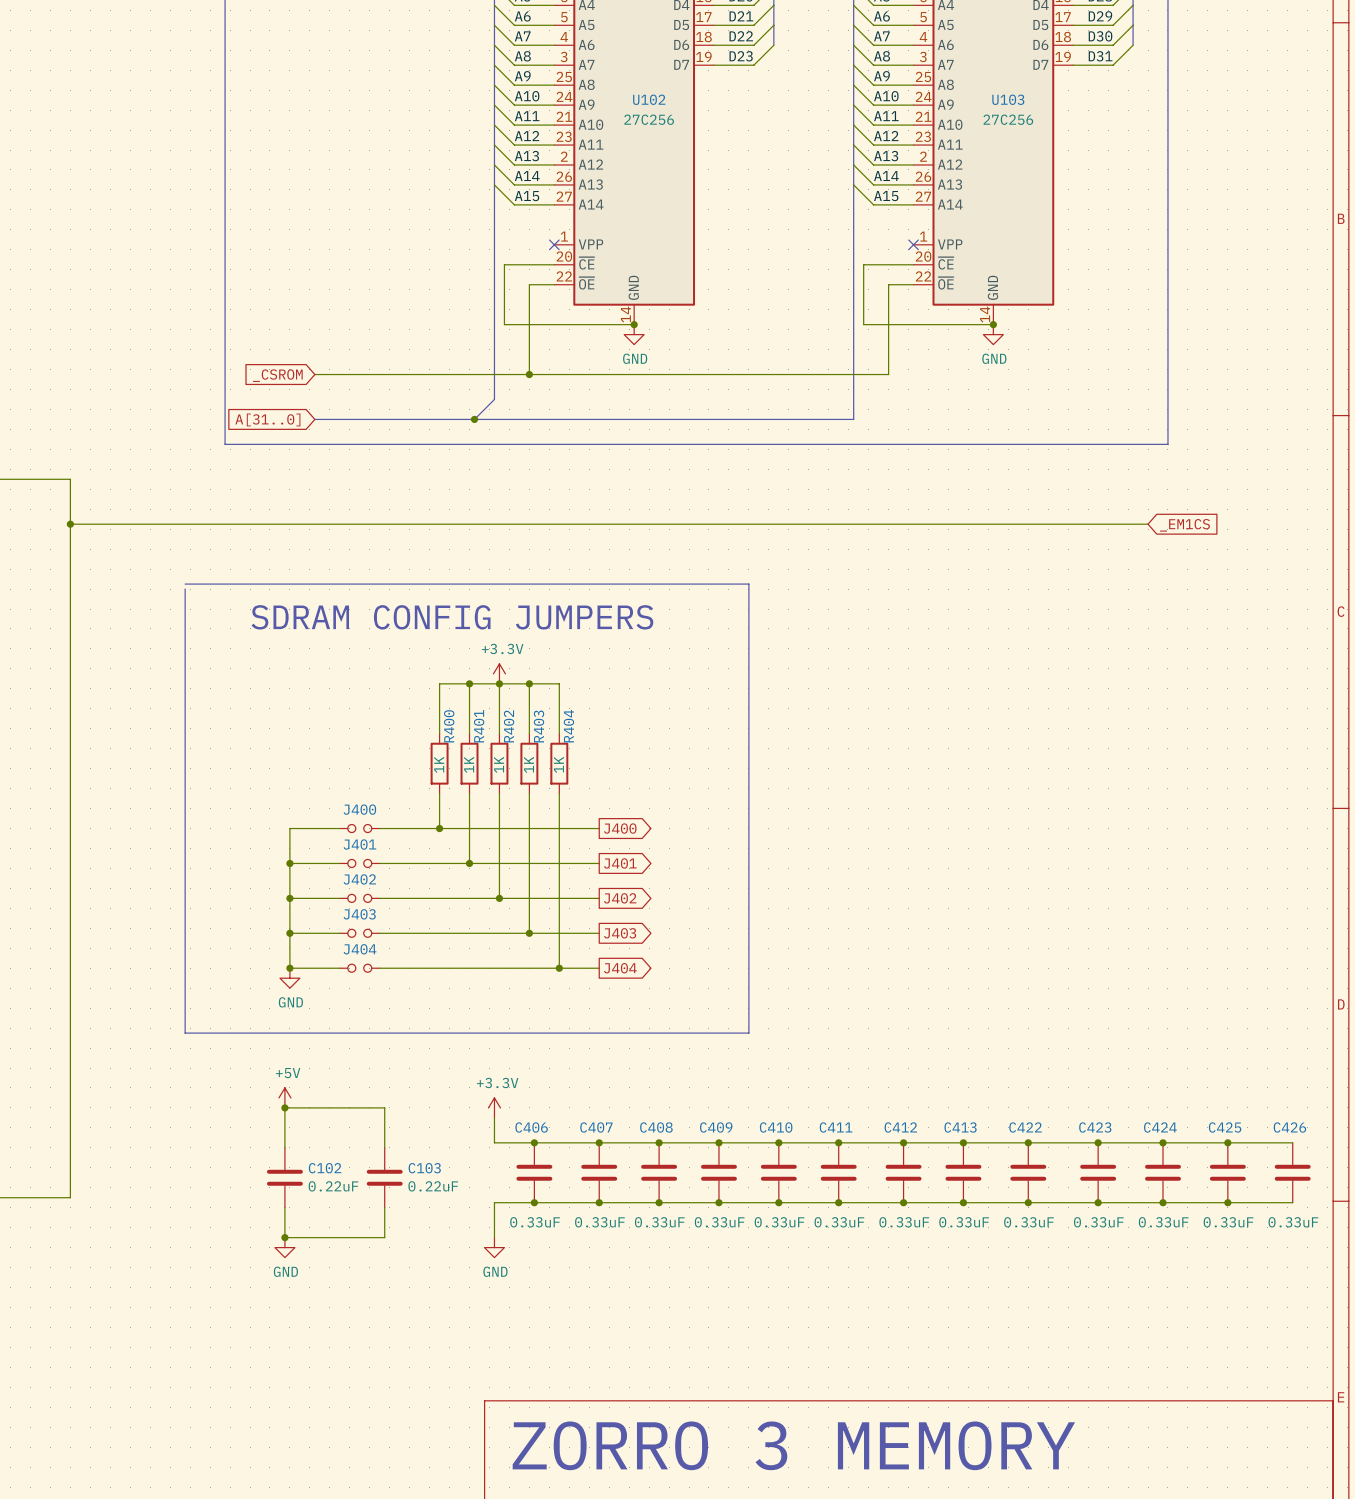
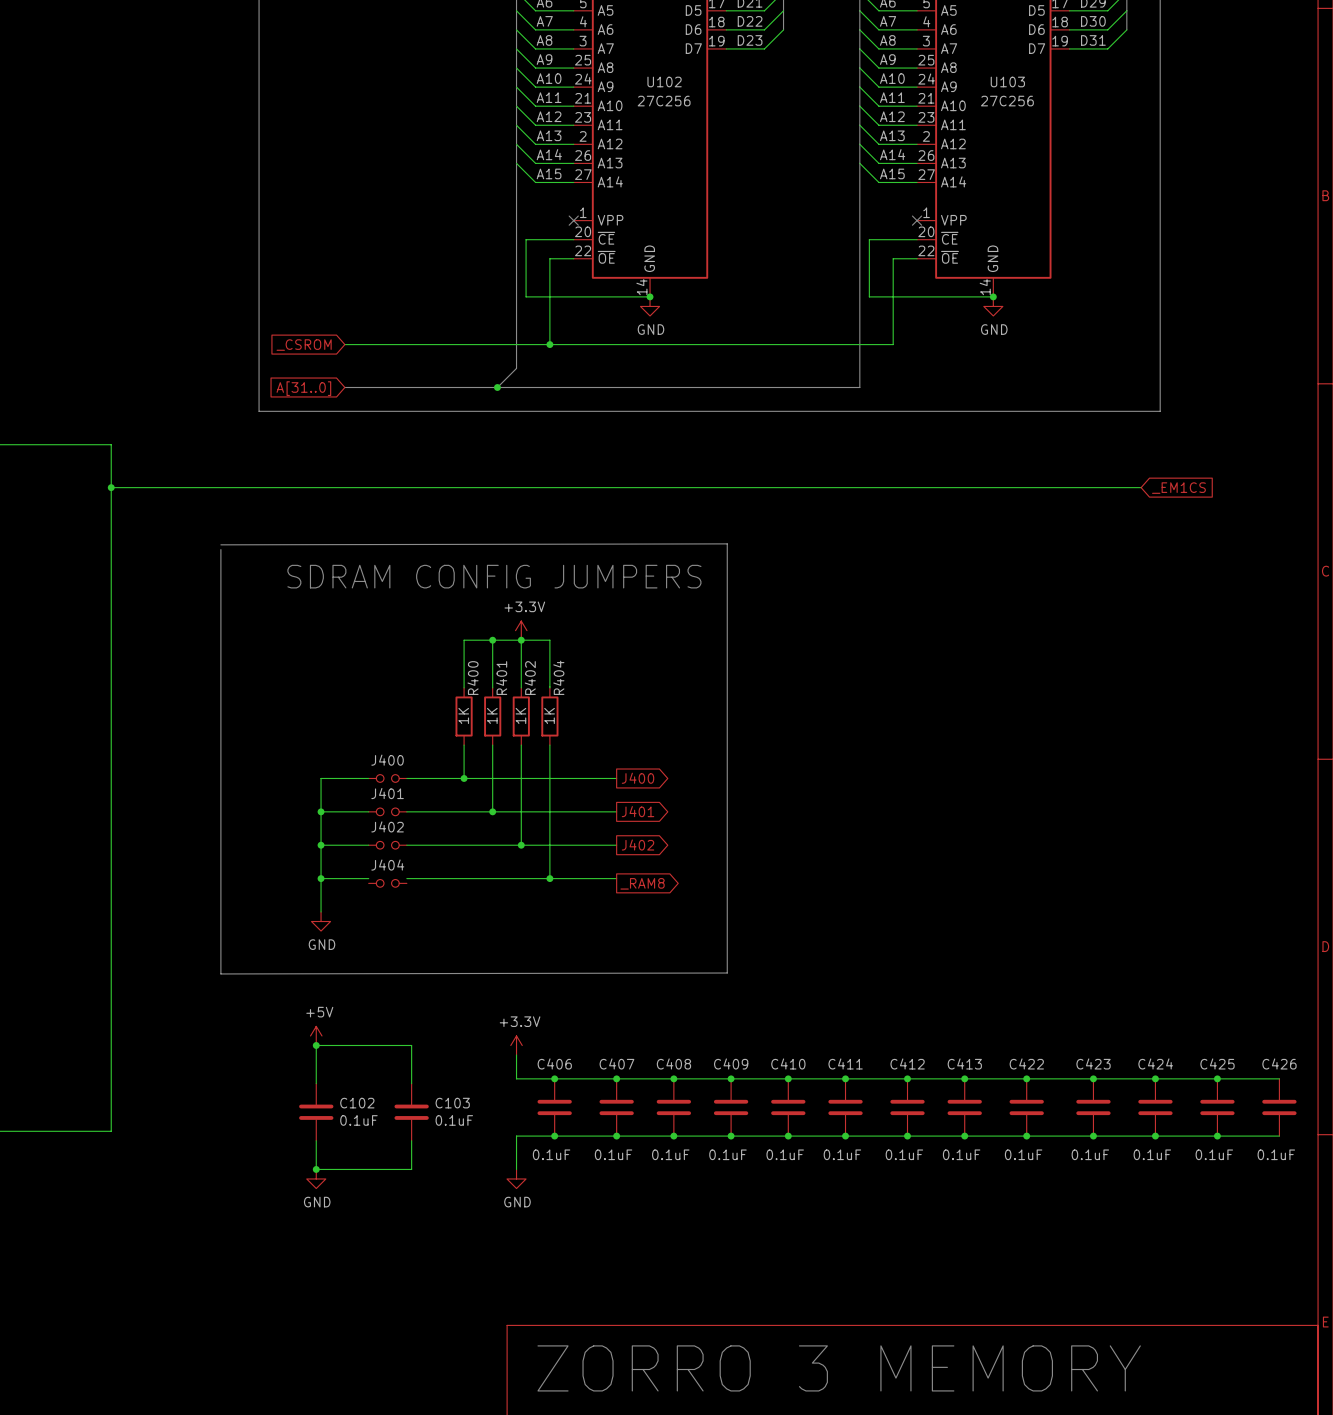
line: (185, 584) (748, 584) (748, 1033) (185, 1033) -> (220, 544) (727, 543) (727, 973) (220, 973)
wire: (529, 683) (559, 683) (559, 733) -> none
junction: (529, 683) -> none
R403 name: R403 (538, 726) -> R404 (558, 677)
R404: 1K (559, 763) -> none
wire: (559, 793) (559, 968) -> none
J403: (359, 933) -> none
global label: J403 (620, 933) -> _RAM8 (642, 883)
wire: (289, 968) (339, 968) -> none
junction: (289, 968) -> none
J404 position: (359, 968) -> (387, 883)
wire: (379, 968) (599, 968) -> none
junction: (559, 968) -> none
global label: J404 (620, 968) -> none
C102 value: 0.22uF (333, 1186) -> 0.1uF (358, 1120)
C103 value: 0.22uF (433, 1186) -> 0.1uF (454, 1120)
C406 value: 0.33uF (535, 1222) -> 0.1uF (551, 1154)
C407 value: 0.33uF (599, 1222) -> 0.1uF (613, 1154)
C408 value: 0.33uF (659, 1222) -> 0.1uF (670, 1154)
C409 value: 0.33uF (719, 1222) -> 0.1uF (727, 1154)
C410 value: 0.33uF (779, 1222) -> 0.1uF (785, 1154)
C411 value: 0.33uF (839, 1222) -> 0.1uF (842, 1154)
C412 value: 0.33uF (904, 1222) -> 0.1uF (904, 1154)
C413 value: 0.33uF (964, 1222) -> 0.1uF (961, 1154)
C422 value: 0.33uF (1028, 1222) -> 0.1uF (1023, 1154)
C423 value: 0.33uF (1098, 1222) -> 0.1uF (1090, 1154)
C424 value: 0.33uF (1163, 1222) -> 0.1uF (1152, 1154)
C425 value: 0.33uF (1228, 1222) -> 0.1uF (1214, 1154)
C426 value: 0.33uF (1293, 1222) -> 0.1uF (1276, 1154)

